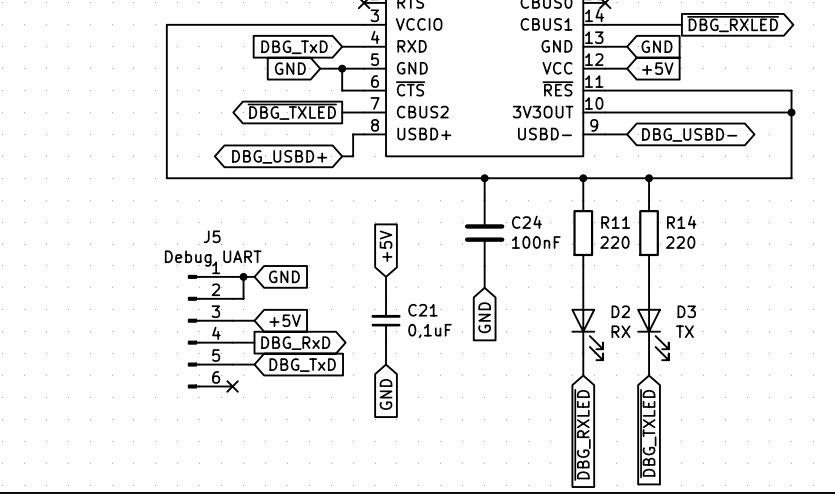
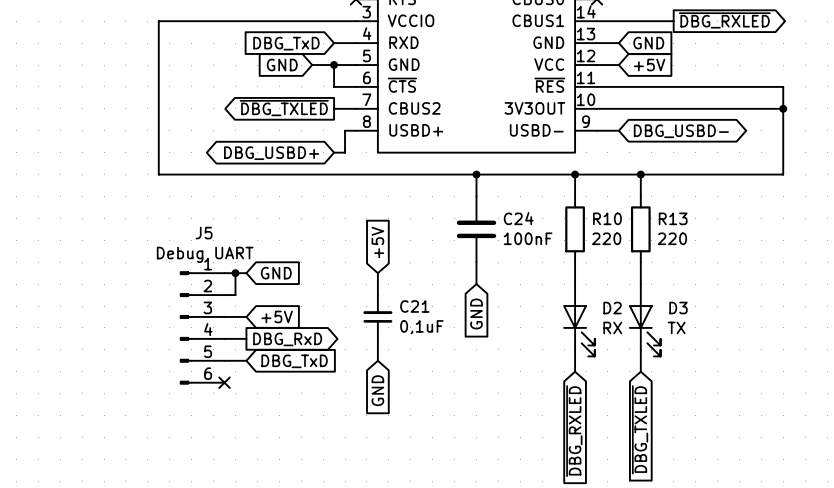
R11 name: R11 (615, 222) -> R10 (607, 218)
R14 name: R14 (681, 222) -> R13 (673, 218)

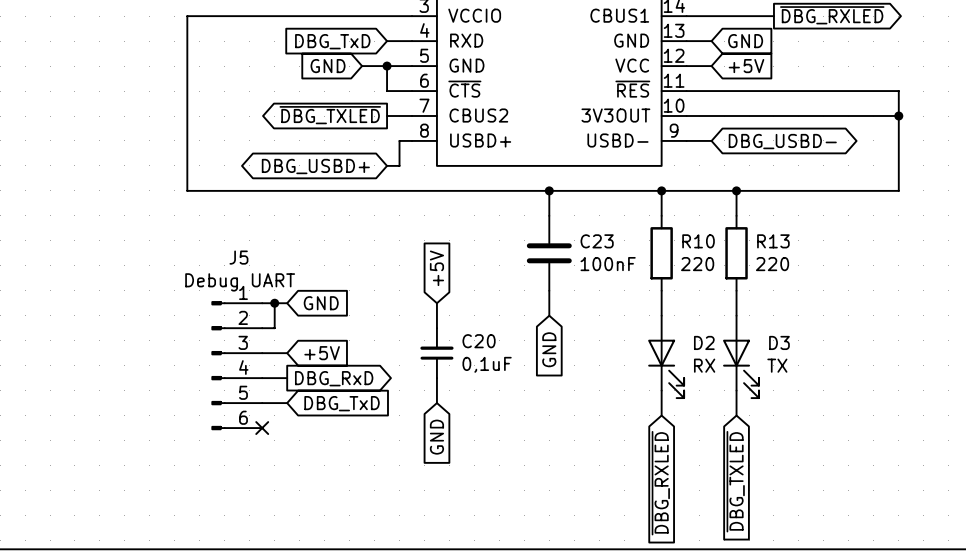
C24 name: C24 (518, 218) -> C23 (597, 241)
C21 name: C21 (414, 306) -> C20 (479, 341)

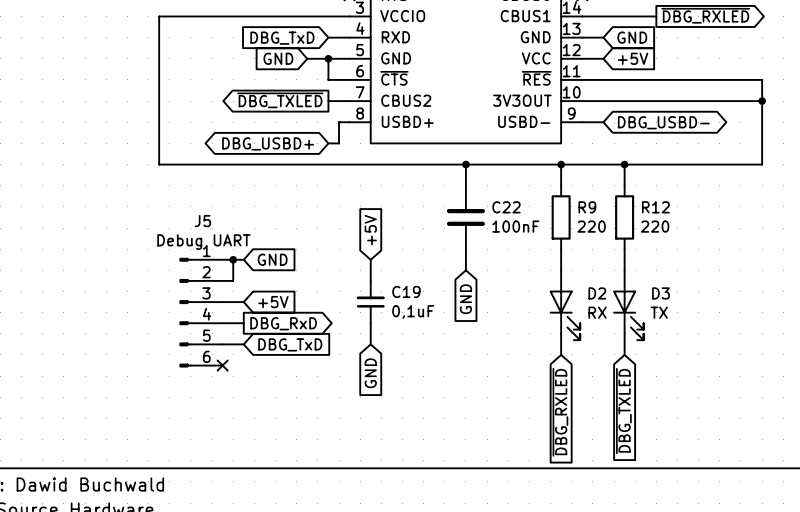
C23 name: C23 (597, 241) -> C22 (506, 207)
R10 name: R10 (698, 241) -> R9 (587, 207)
R13 name: R13 (773, 241) -> R12 (655, 207)
C20 name: C20 (479, 341) -> C19 (406, 291)

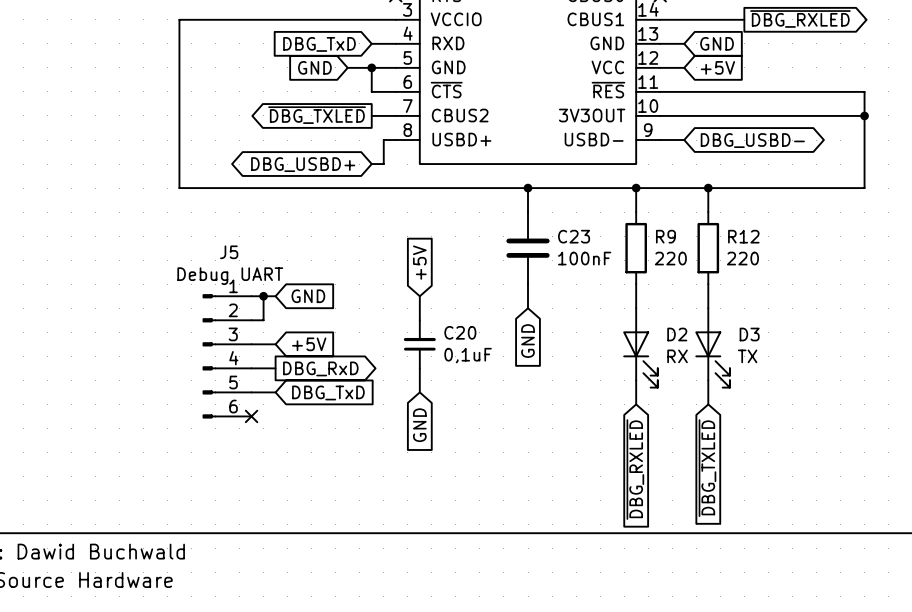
C22 name: C22 (506, 207) -> C23 (574, 236)
C19 name: C19 (406, 291) -> C20 (460, 332)

